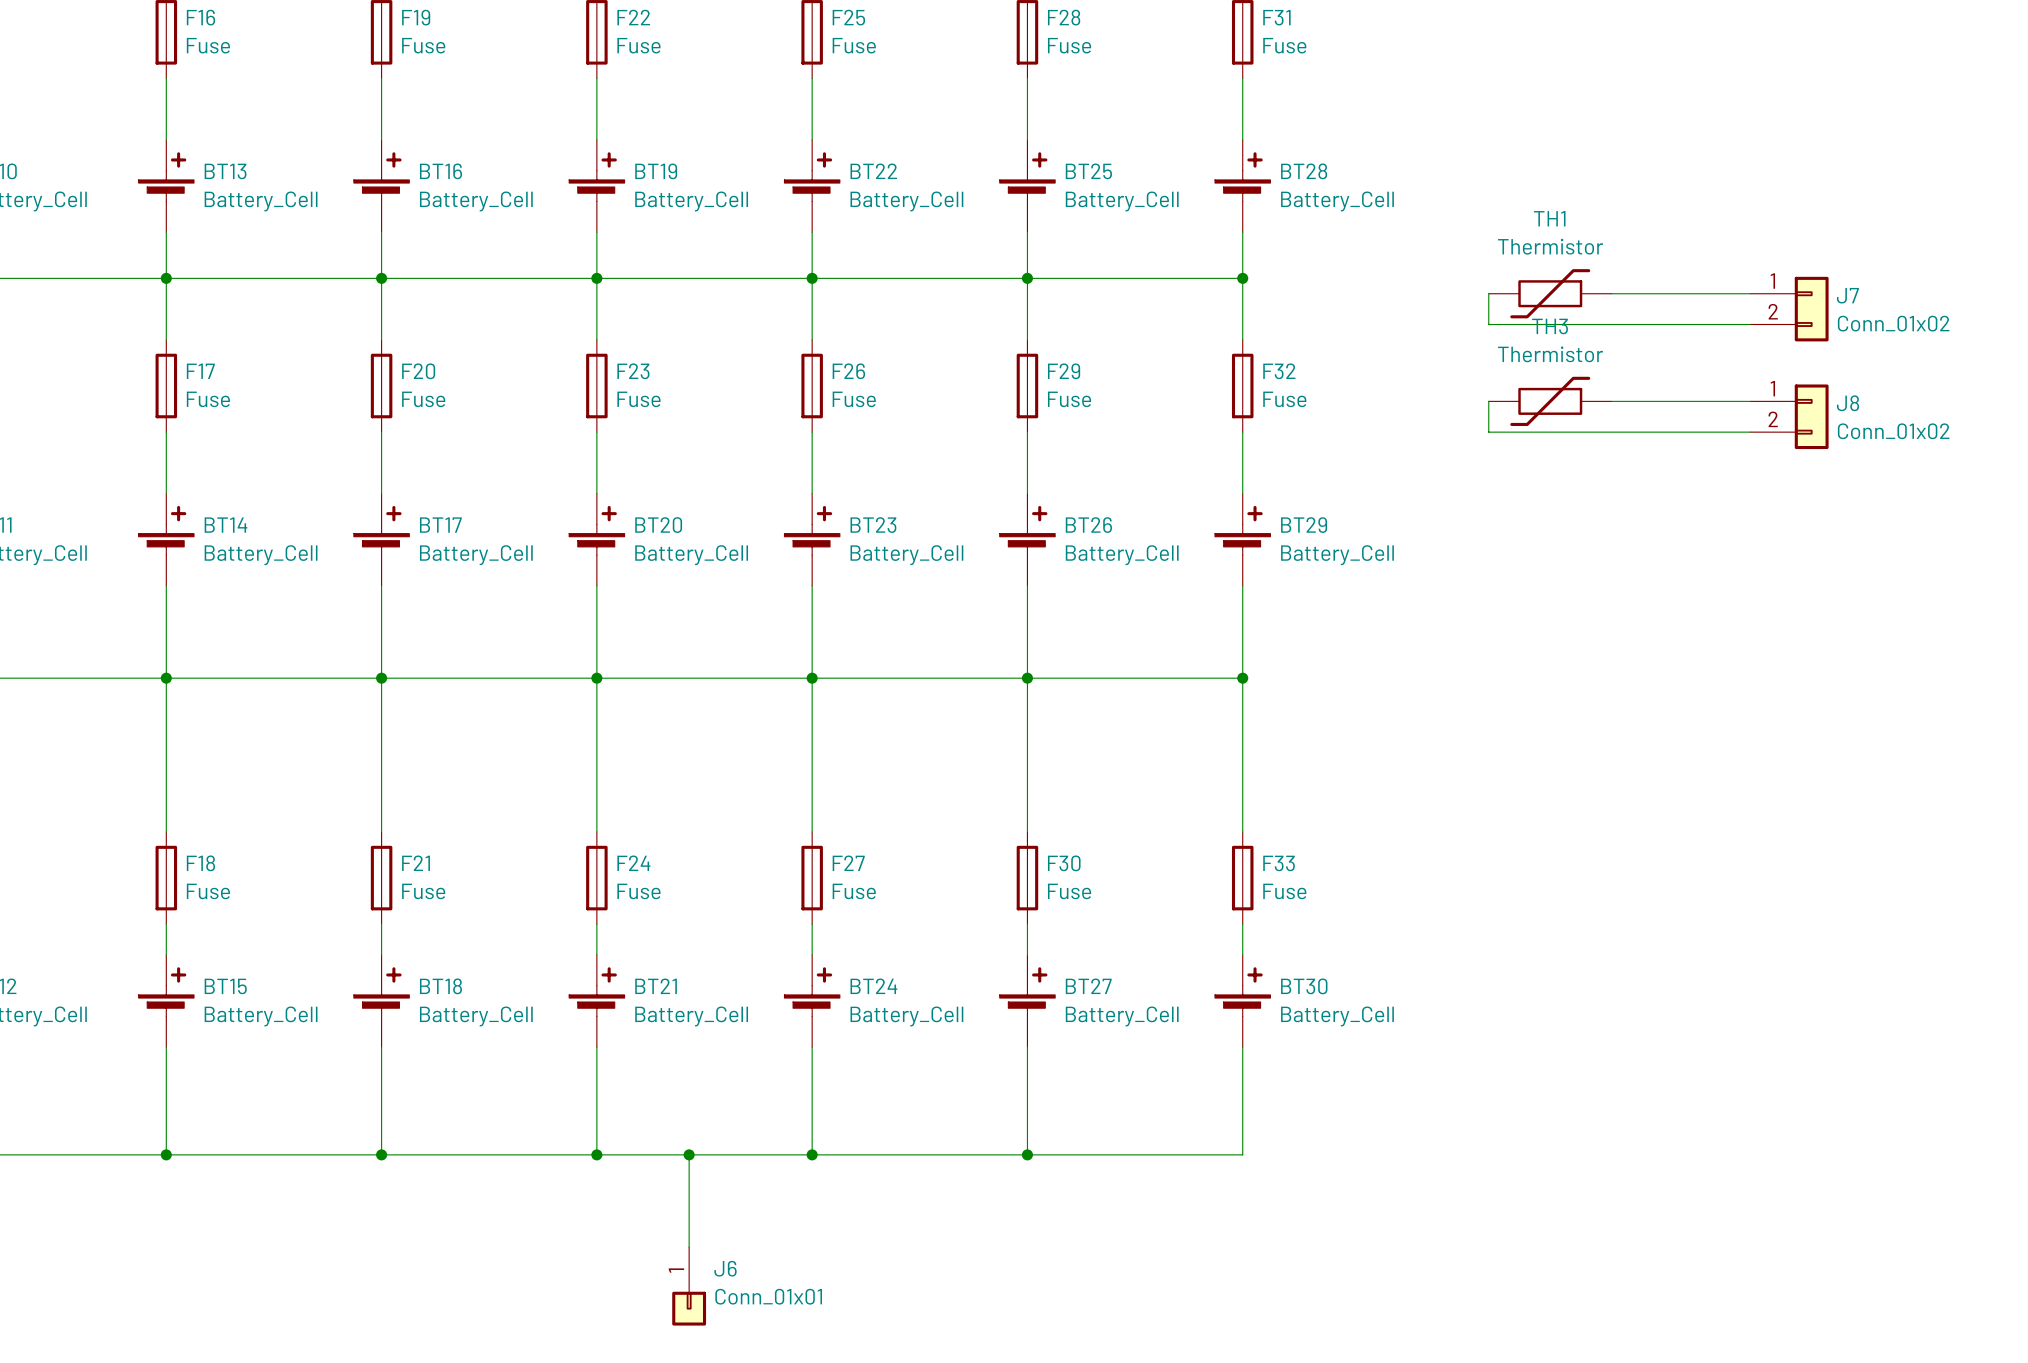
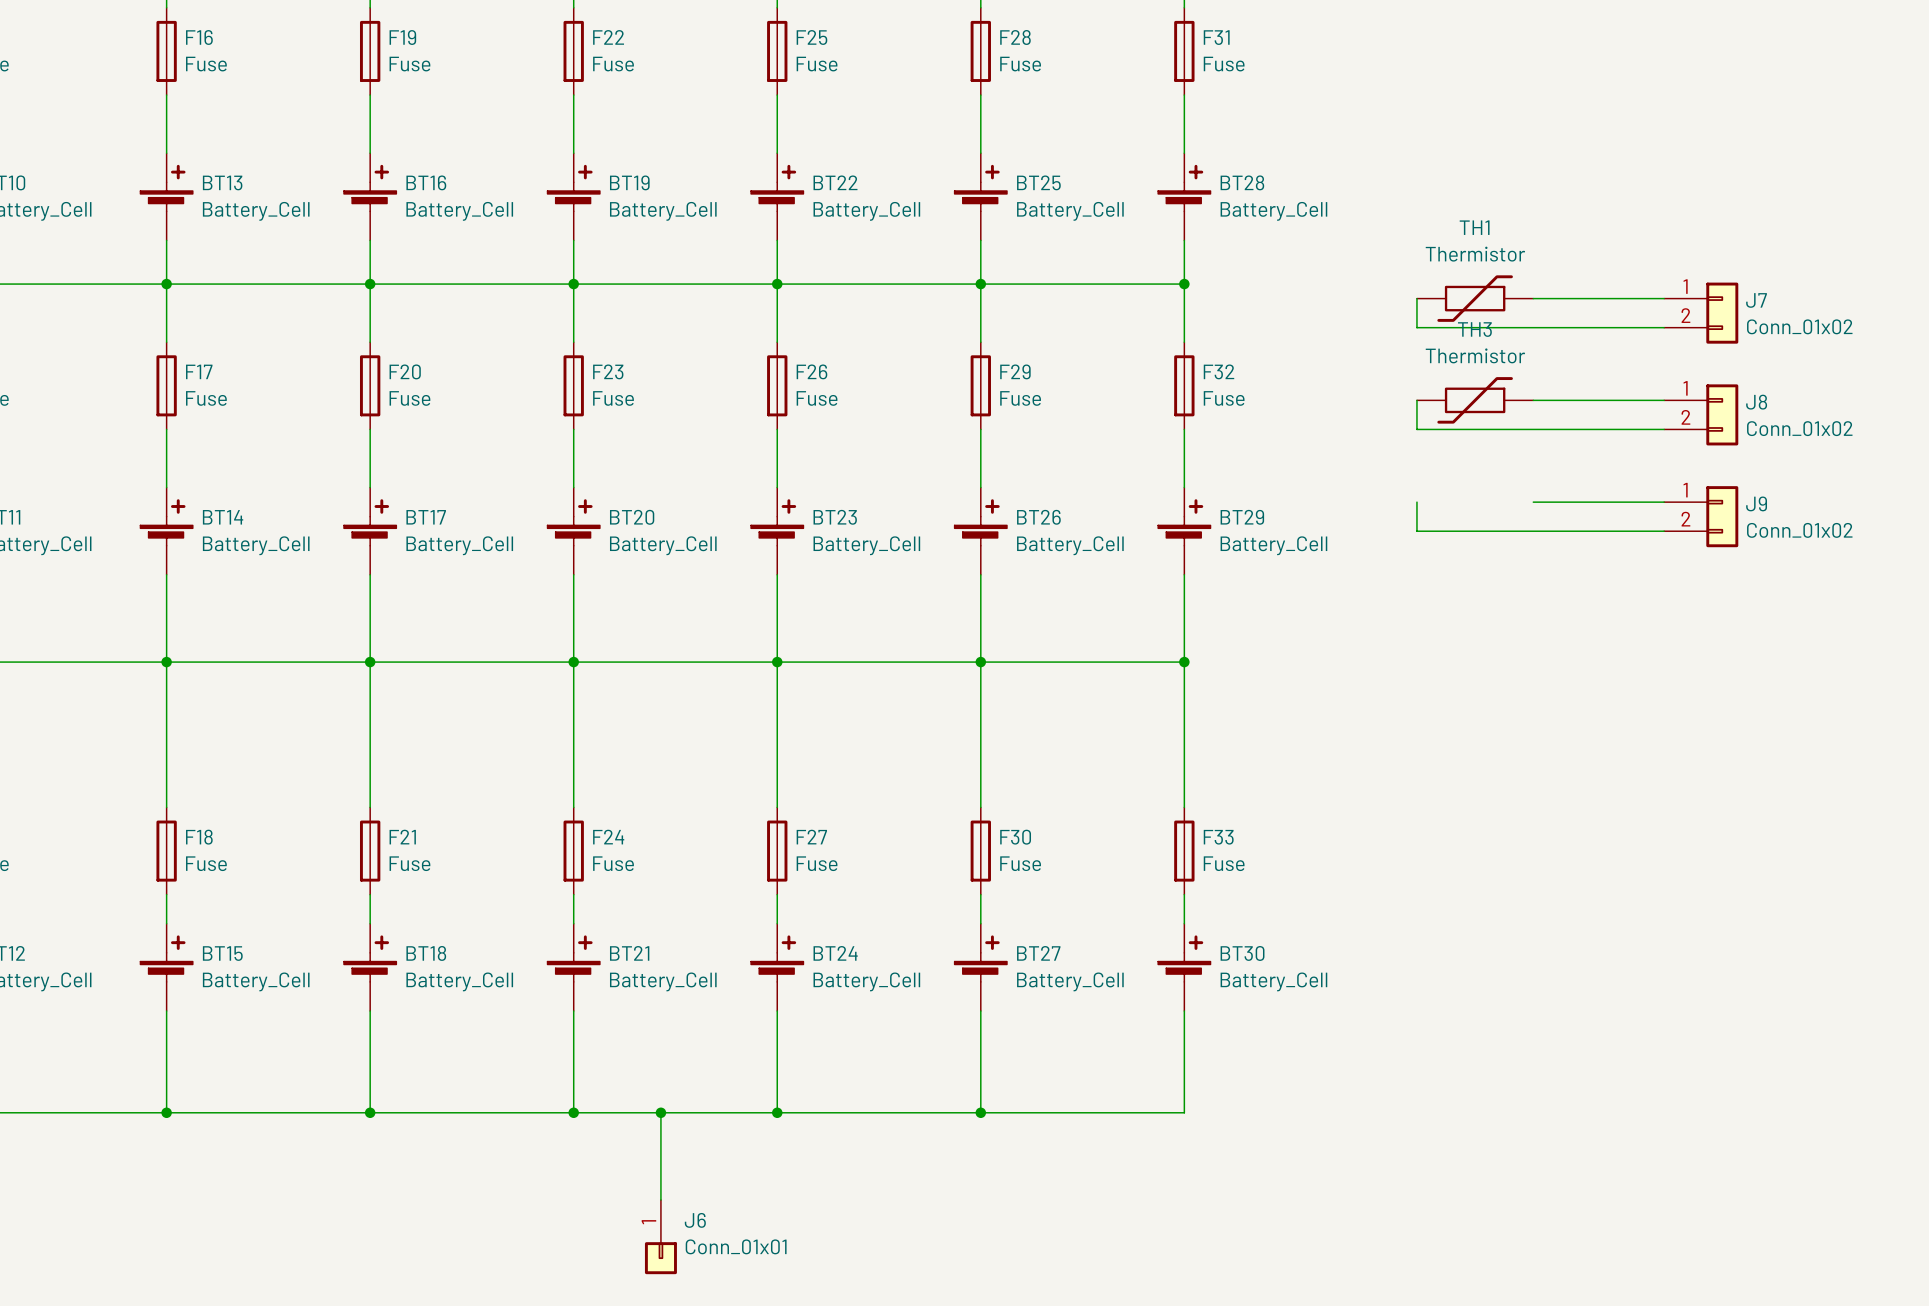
wire: none -> (1416, 502) (1416, 531) (1664, 531)
wire: none -> (1533, 502) (1664, 502)
J9: none -> Conn_01x02 (1701, 516)

